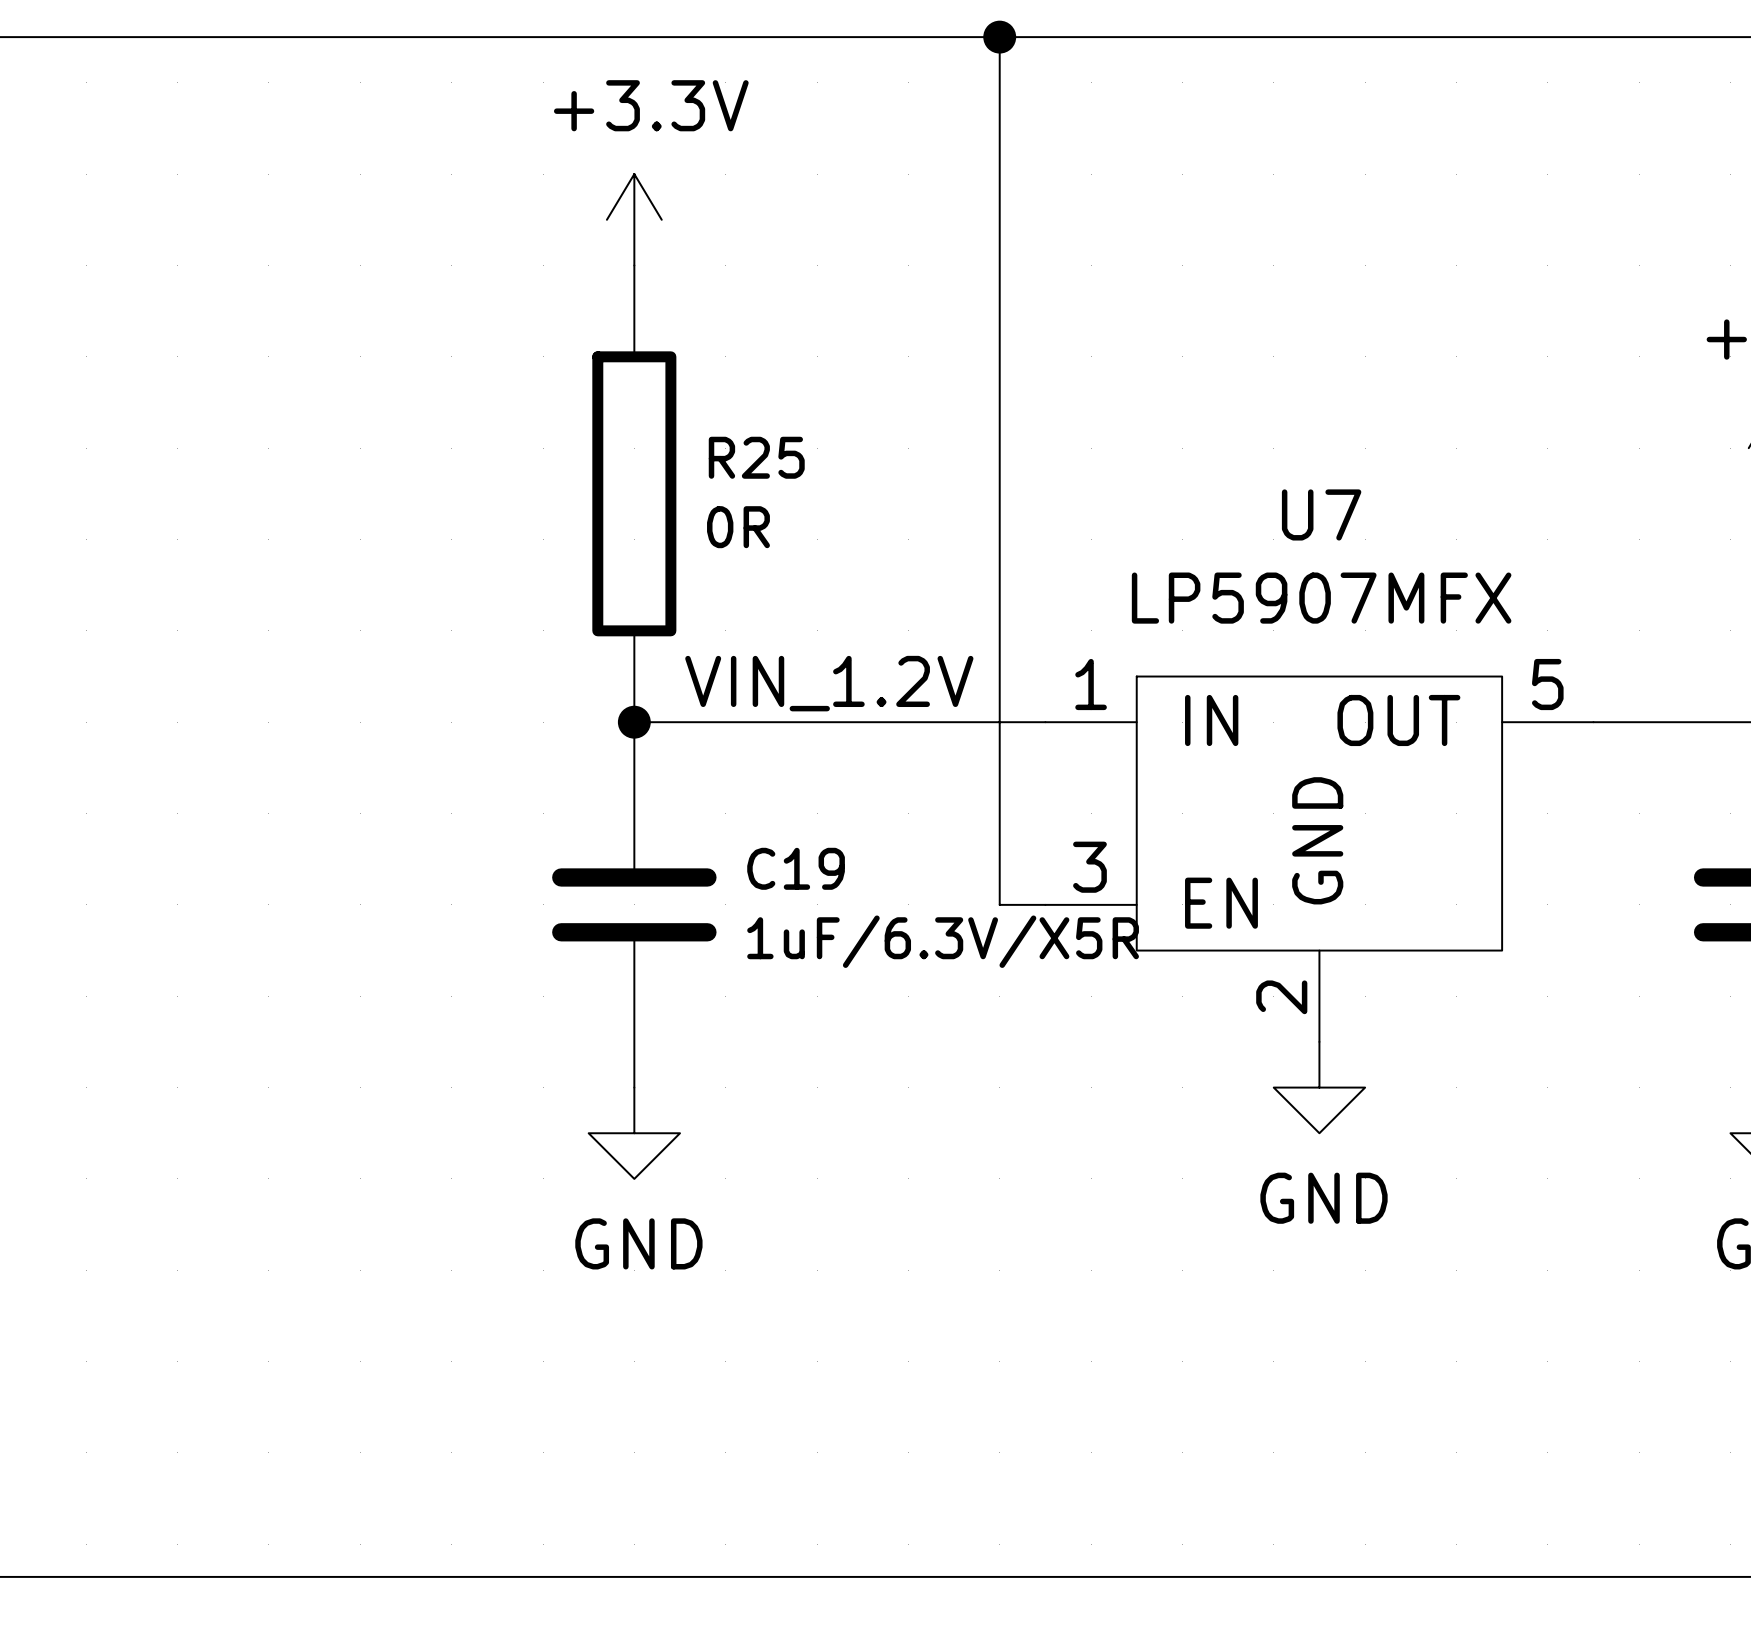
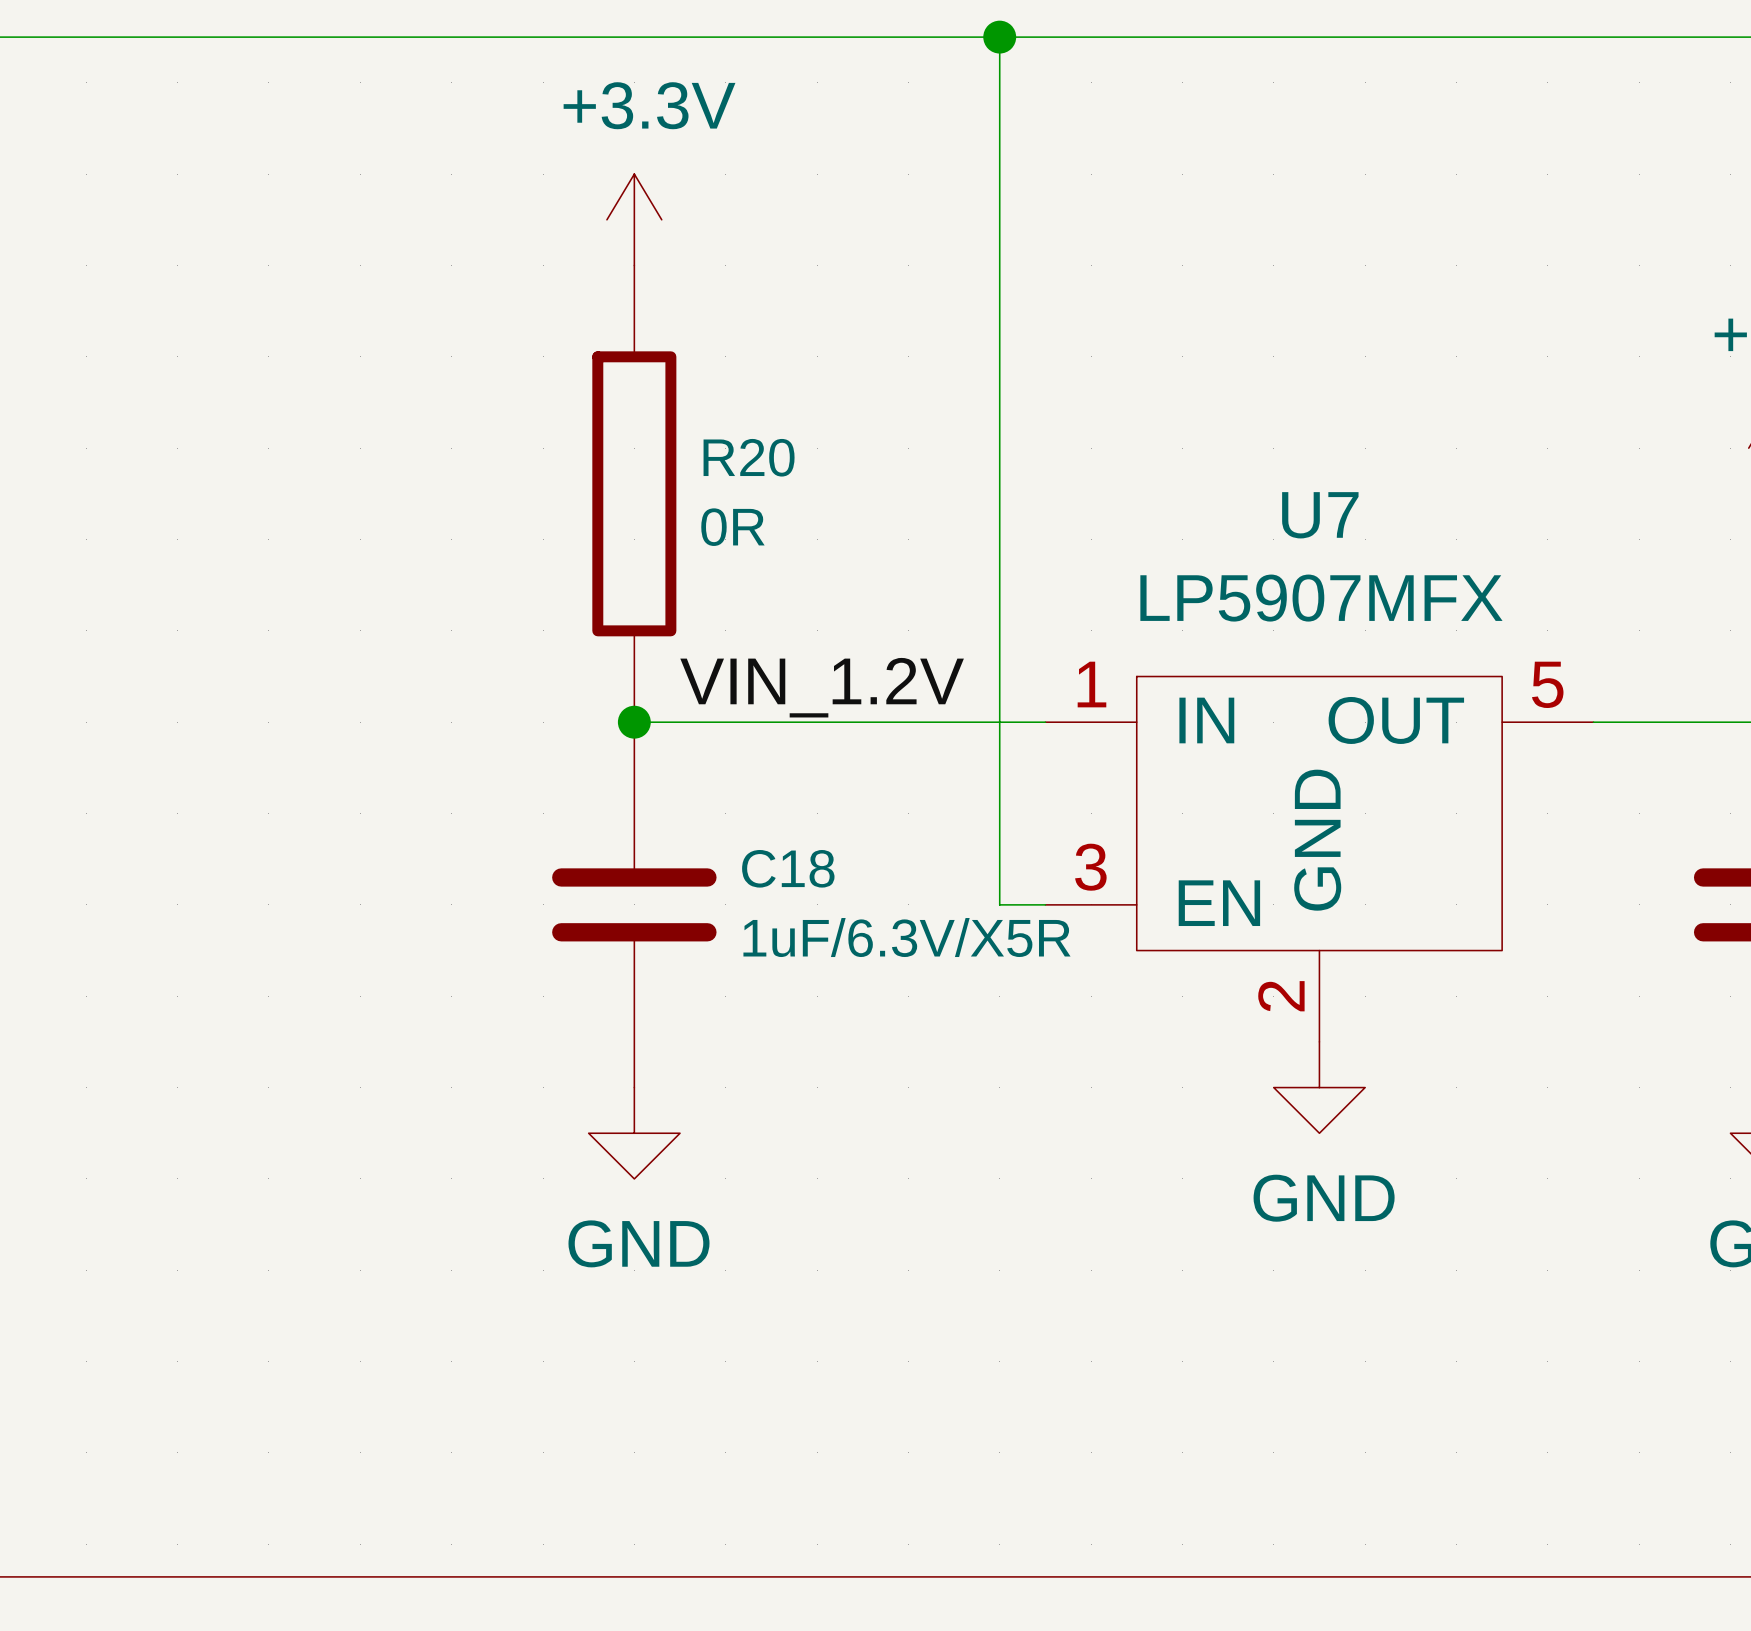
R25 name: R25 (756, 457) -> R20 (749, 457)
C19 name: C19 (796, 868) -> C18 (788, 868)

